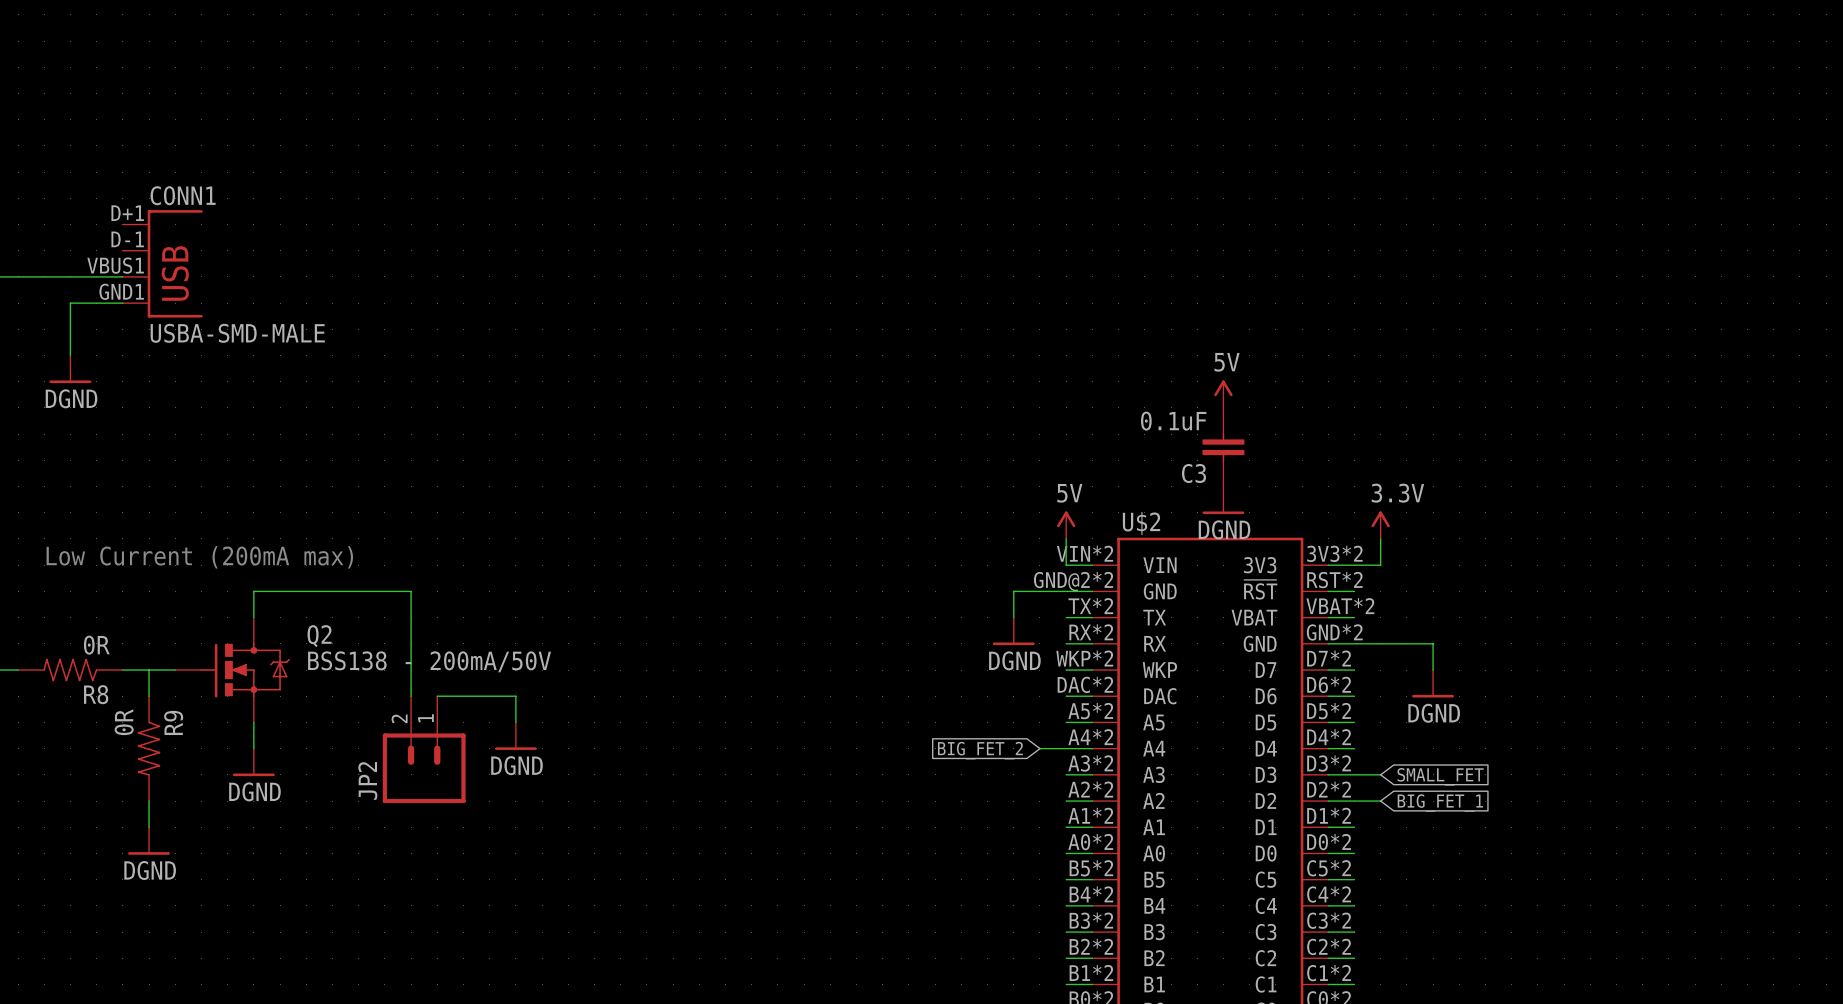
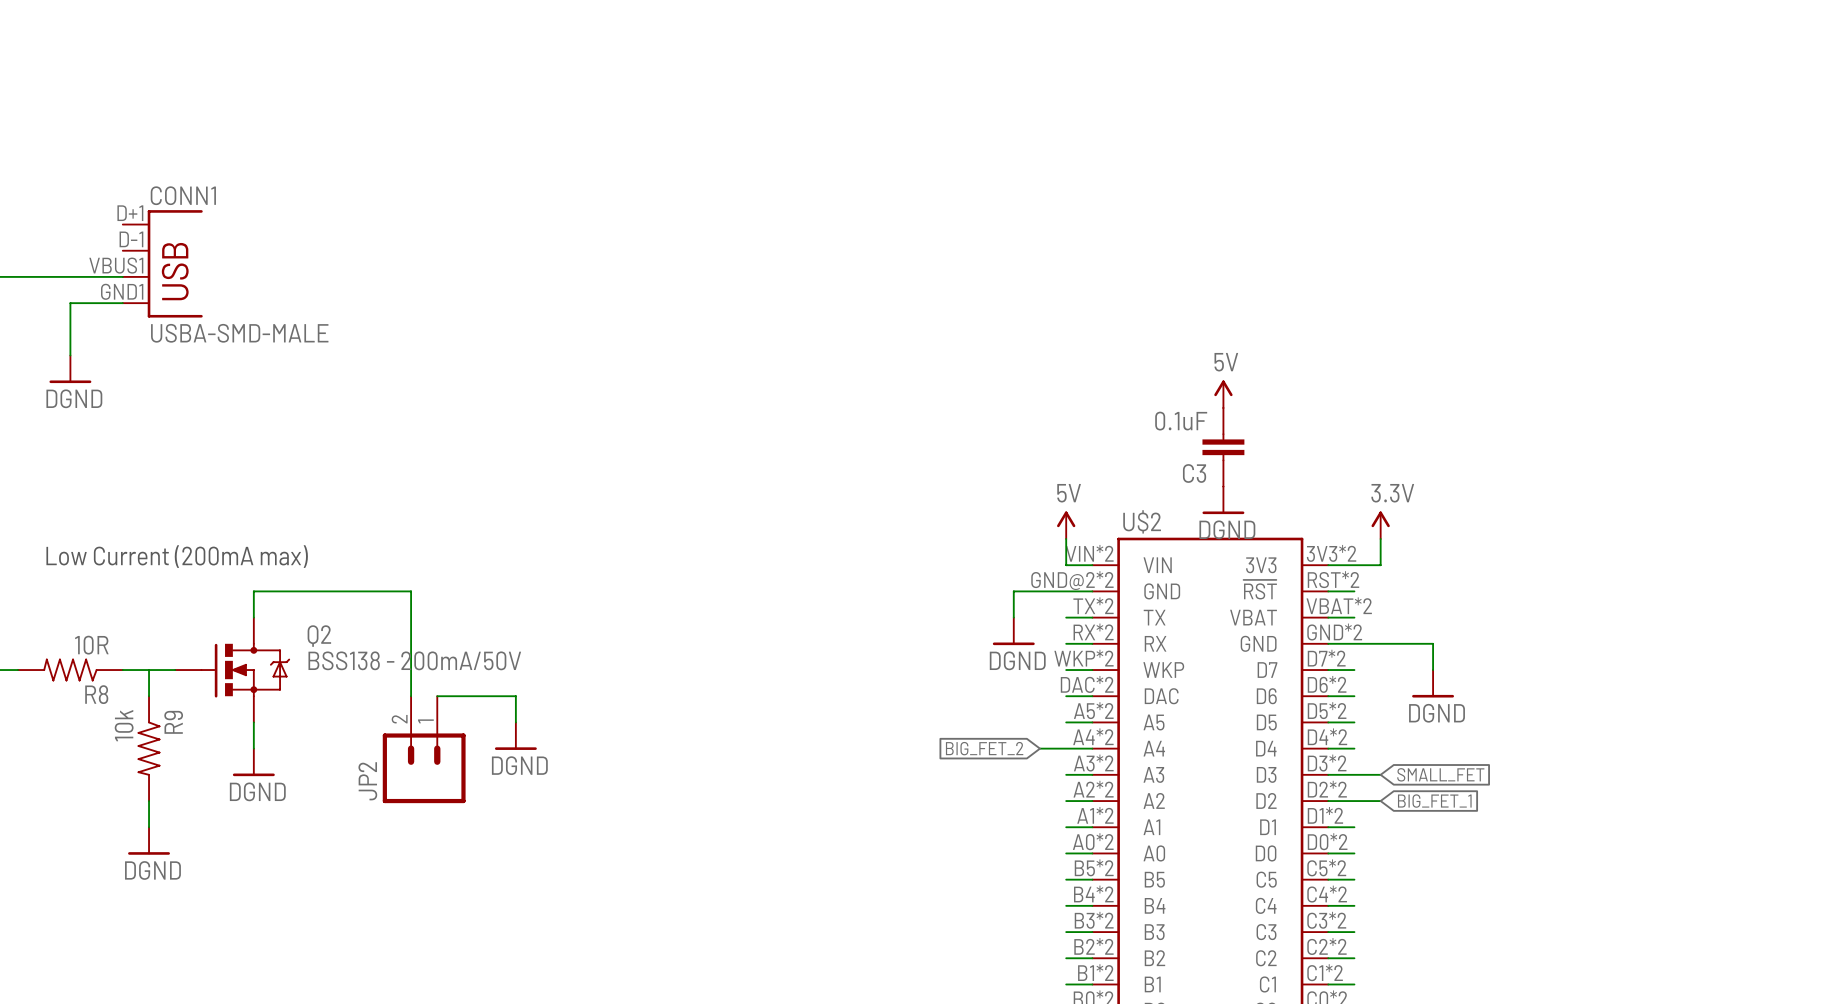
R8 value: 0R (96, 645) -> 10R (91, 645)
R9 value: 0R (124, 722) -> 10k (124, 725)

